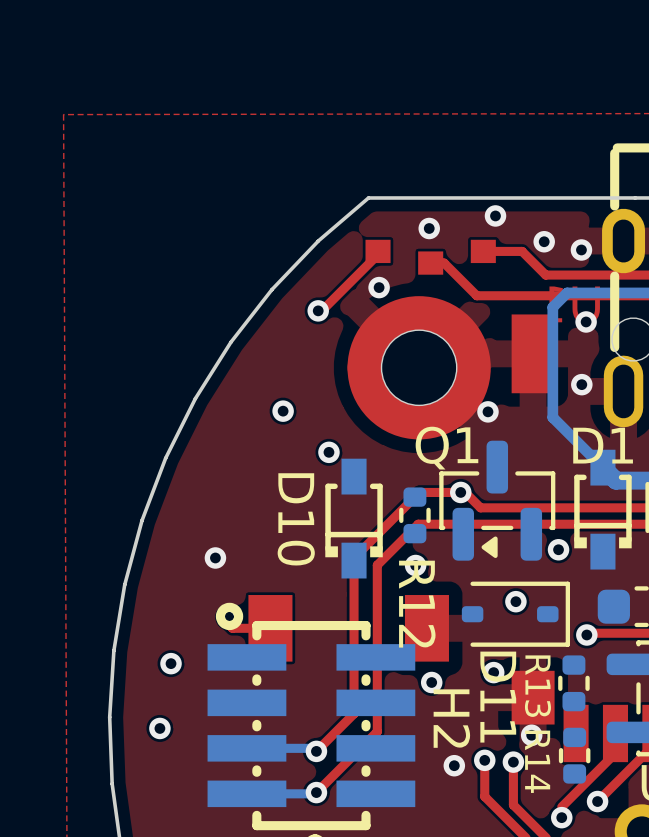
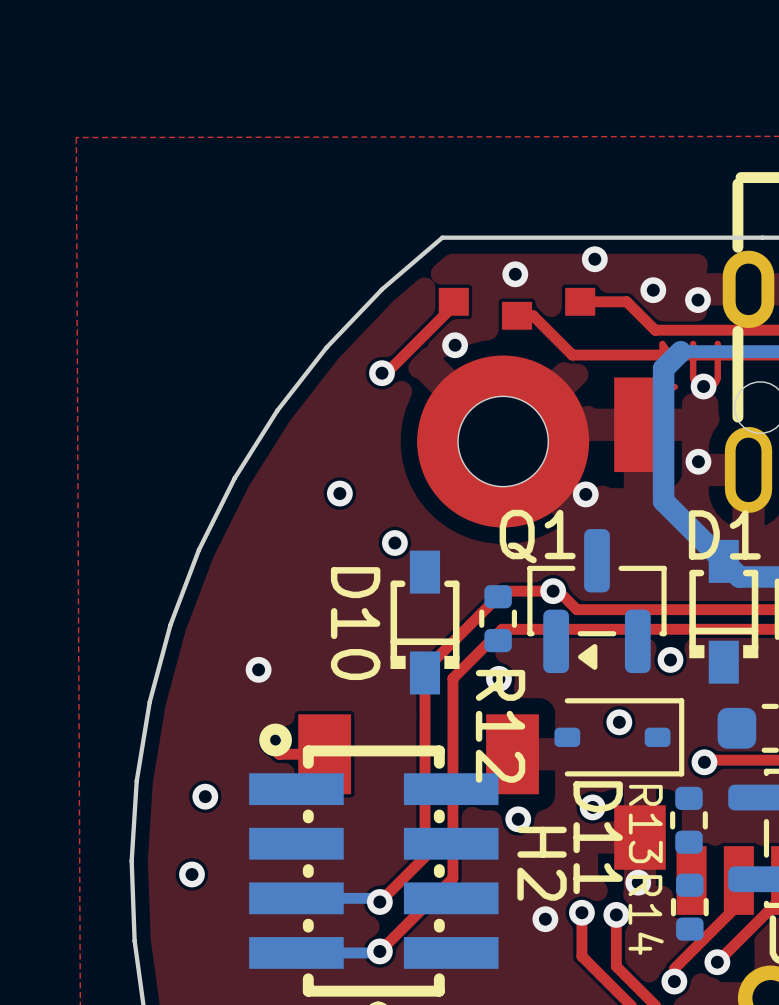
bottom track width: thin (567, 292) (552, 307) (552, 417) (602, 467) -> thick (680, 351) (663, 368) (663, 501) (723, 561)

